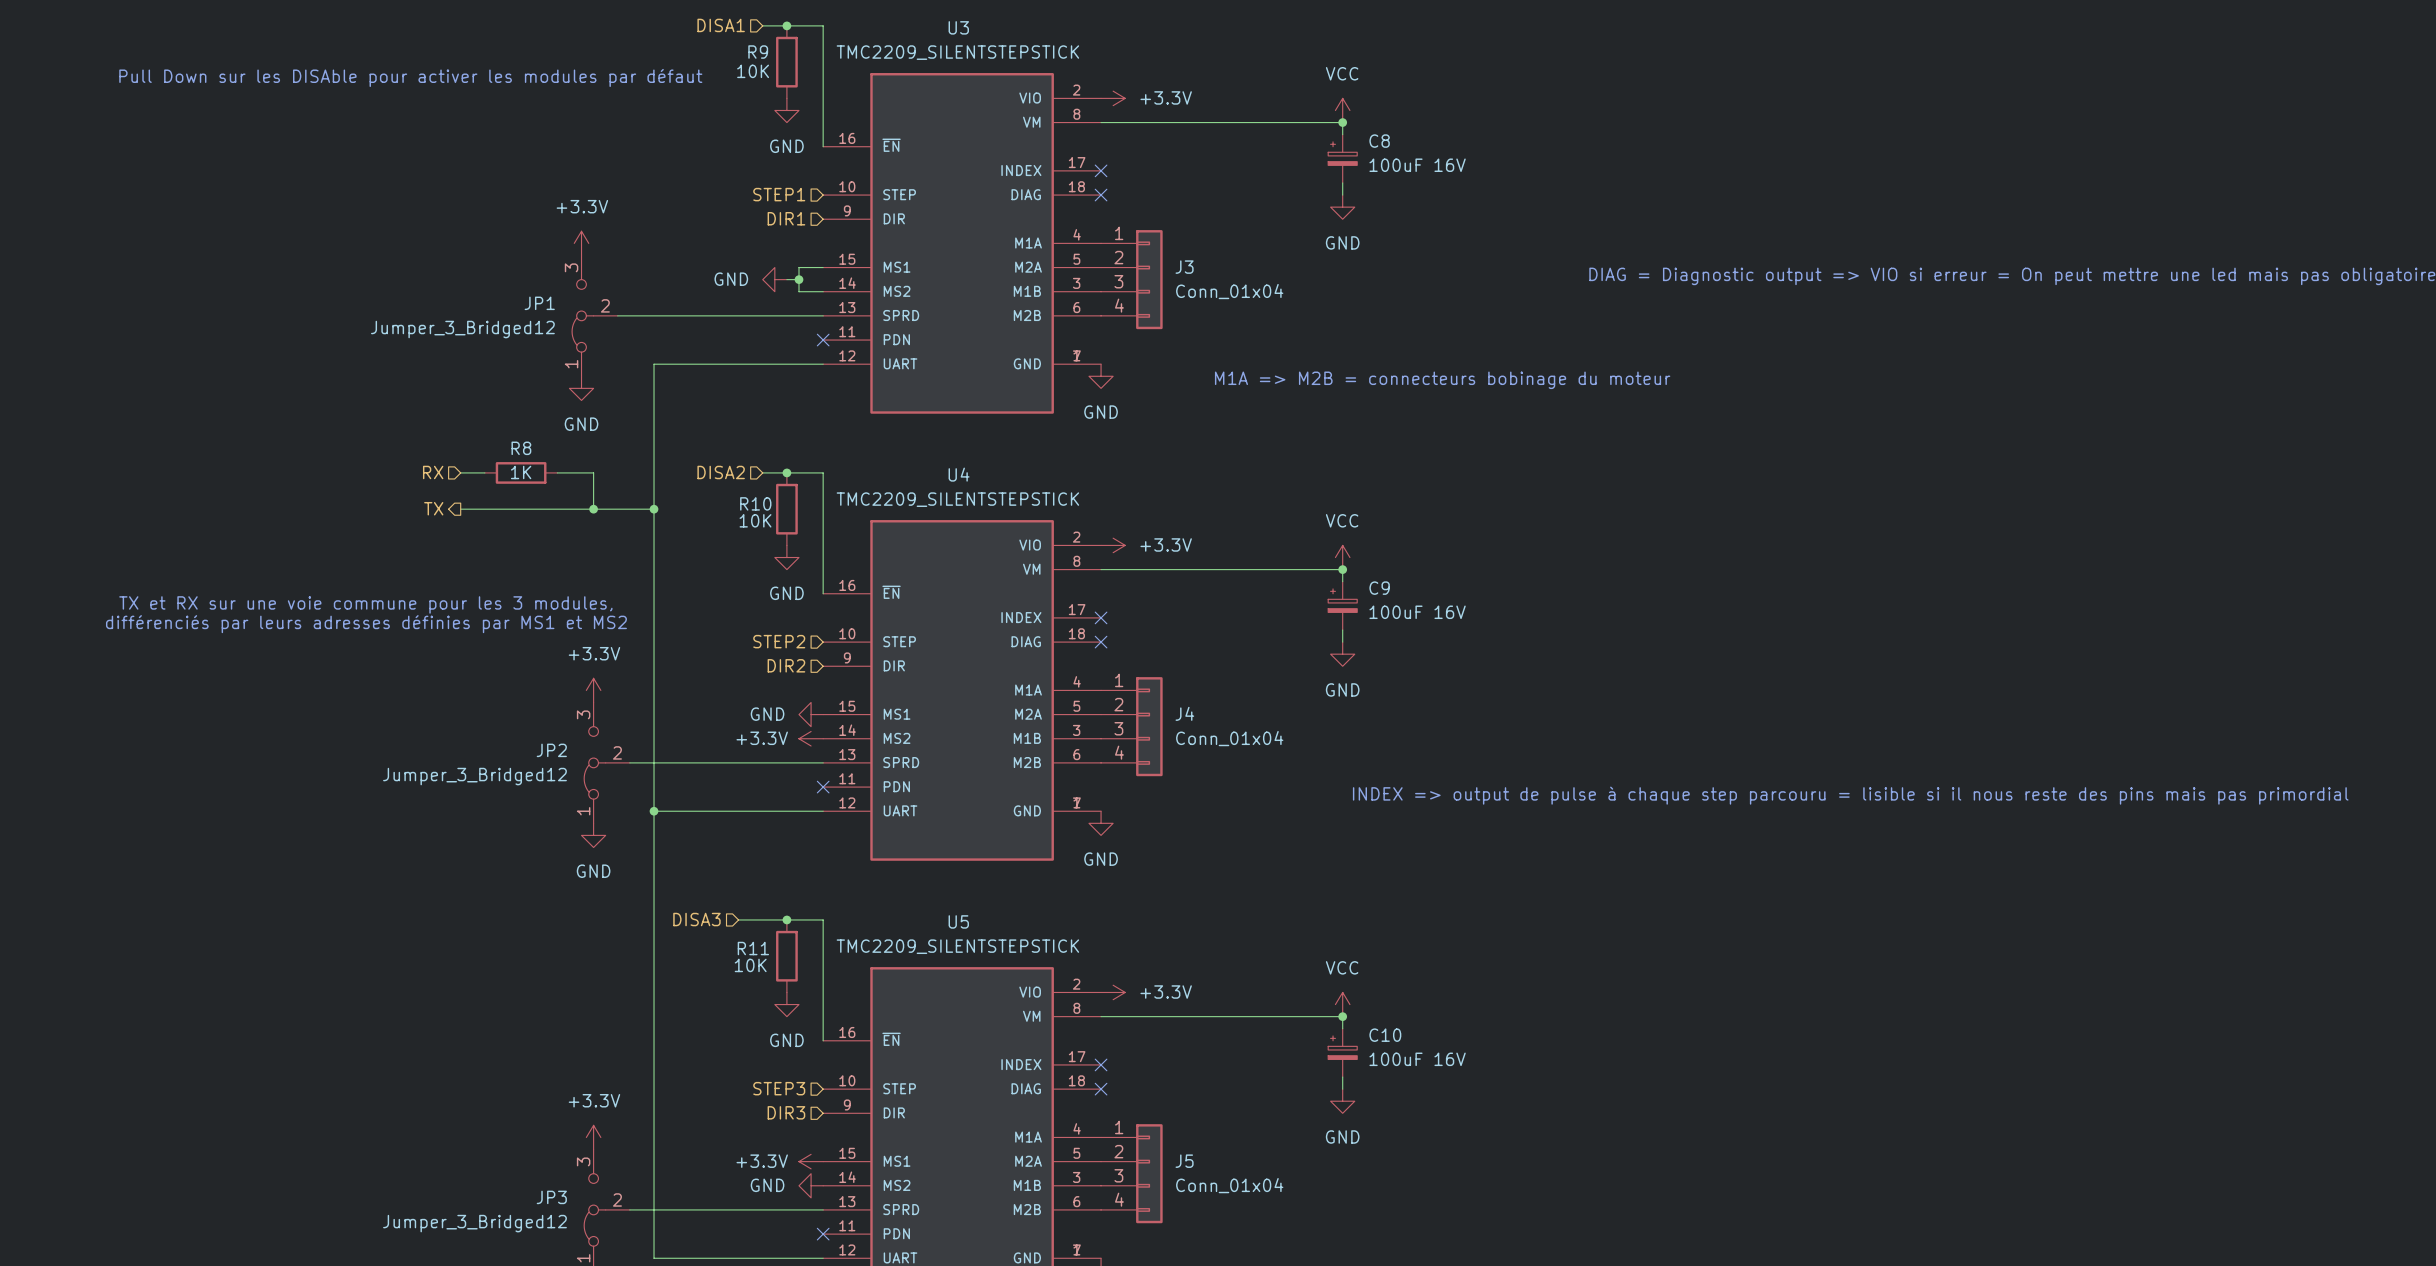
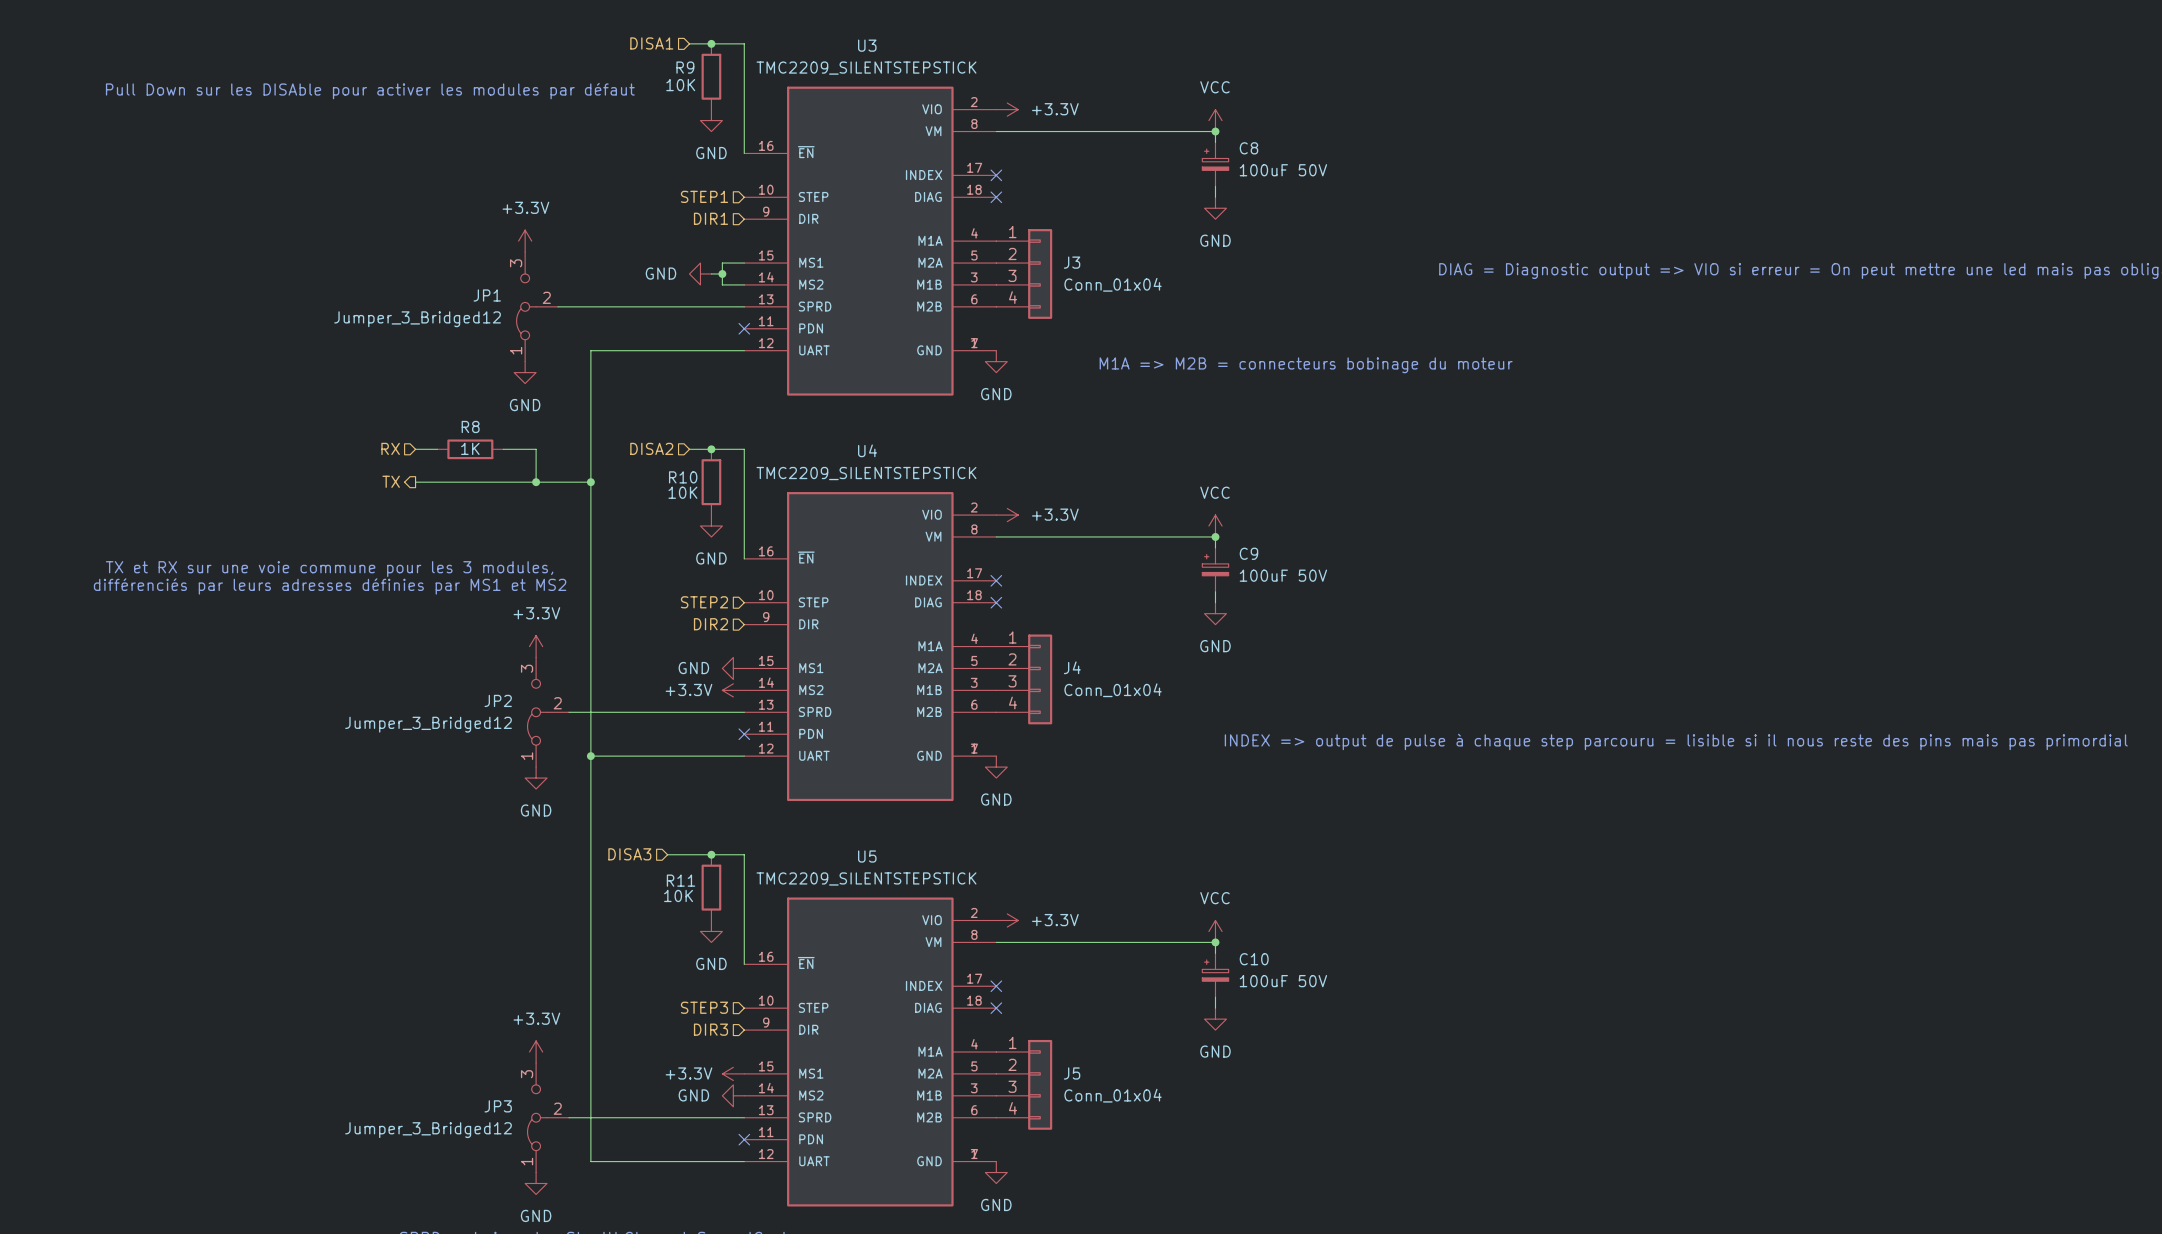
C8 value: 100uF 16V (1417, 165) -> 100uF 50V (1283, 170)
C9 value: 100uF 16V (1417, 612) -> 100uF 50V (1283, 575)
C10 value: 100uF 16V (1417, 1059) -> 100uF 50V (1283, 981)

